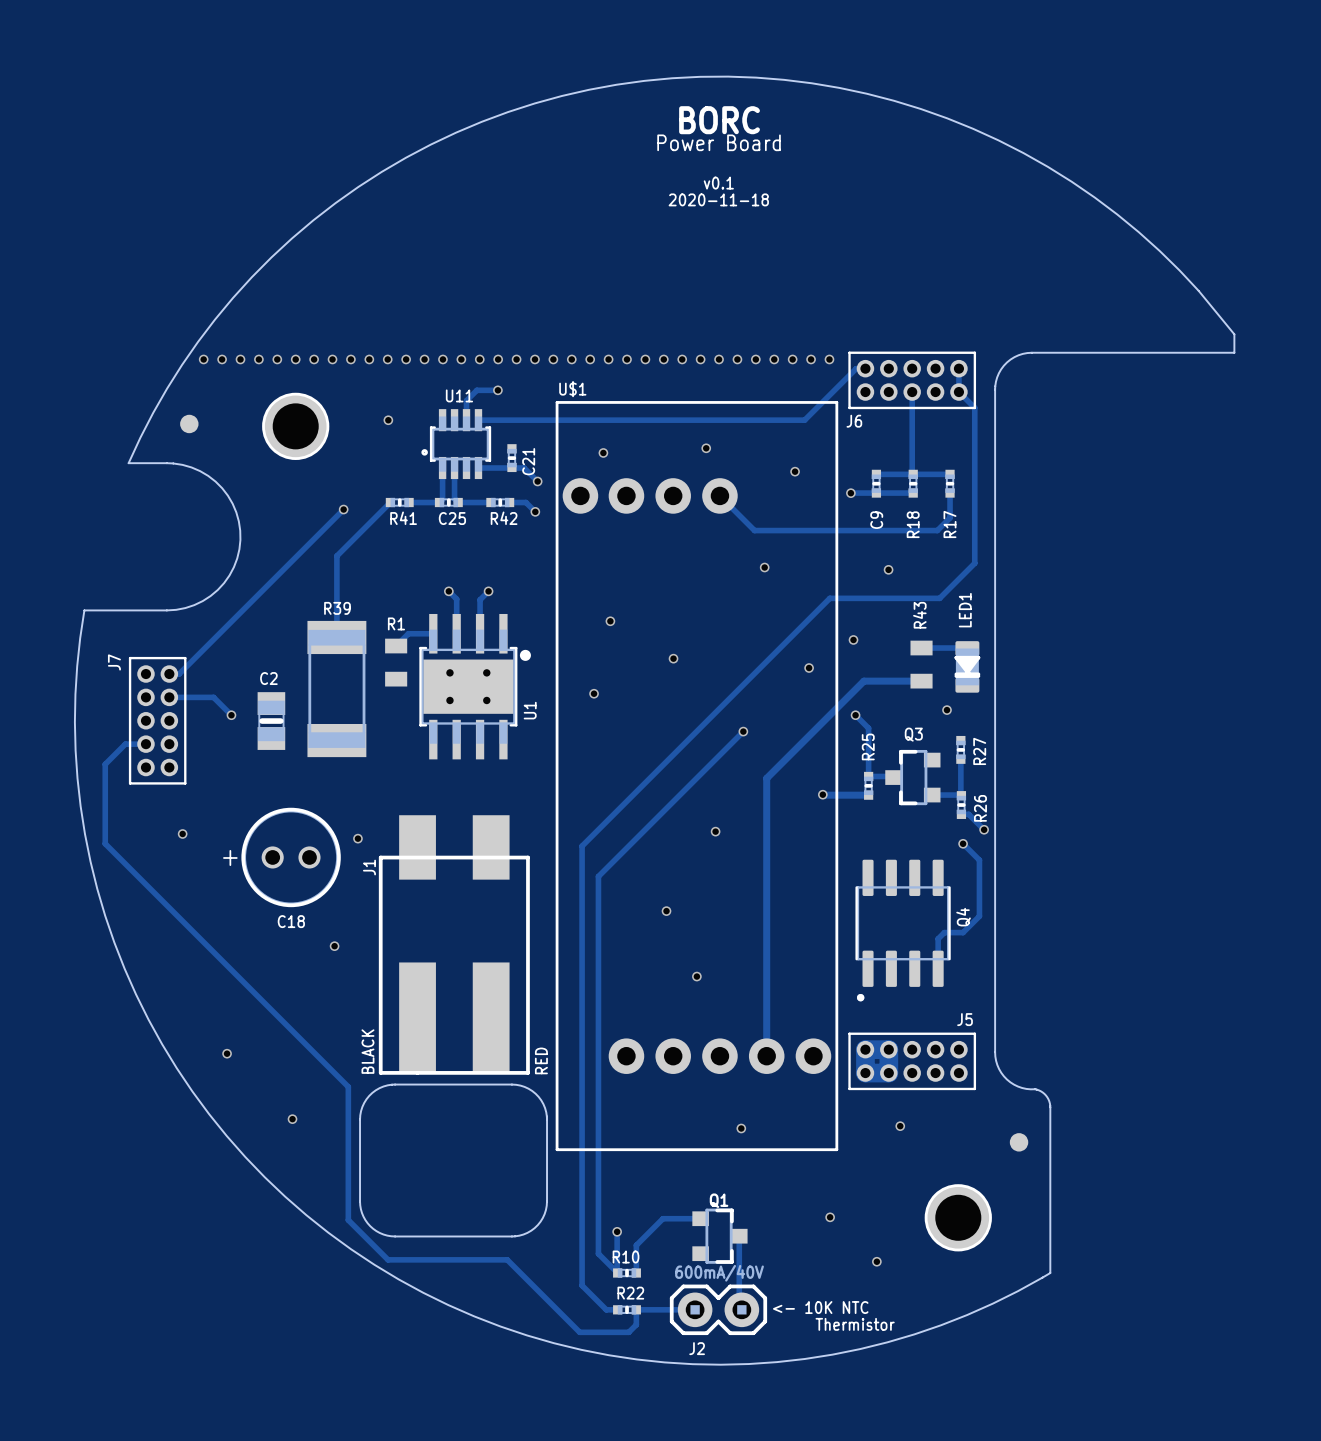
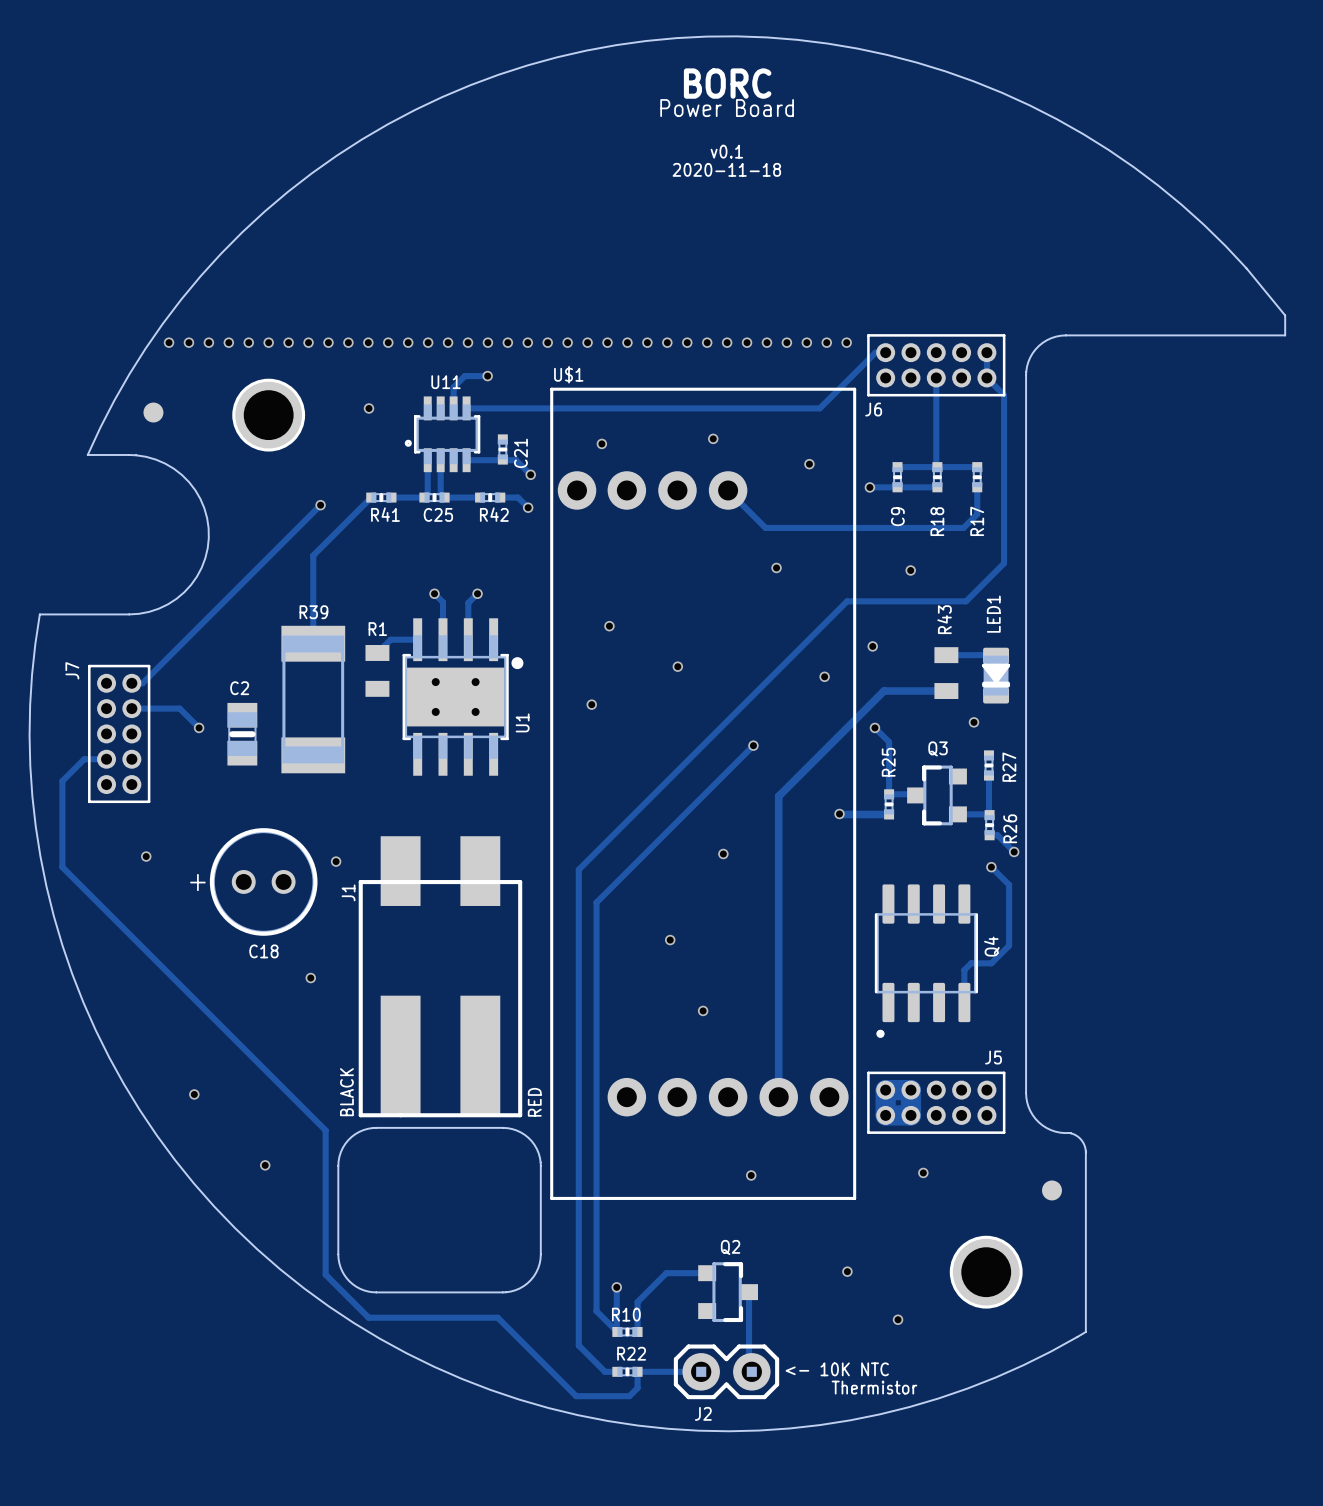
Q1 name: Q1 (719, 1200) -> Q2 (730, 1247)
Q1 value: 600mA/40V (719, 1273) -> none

